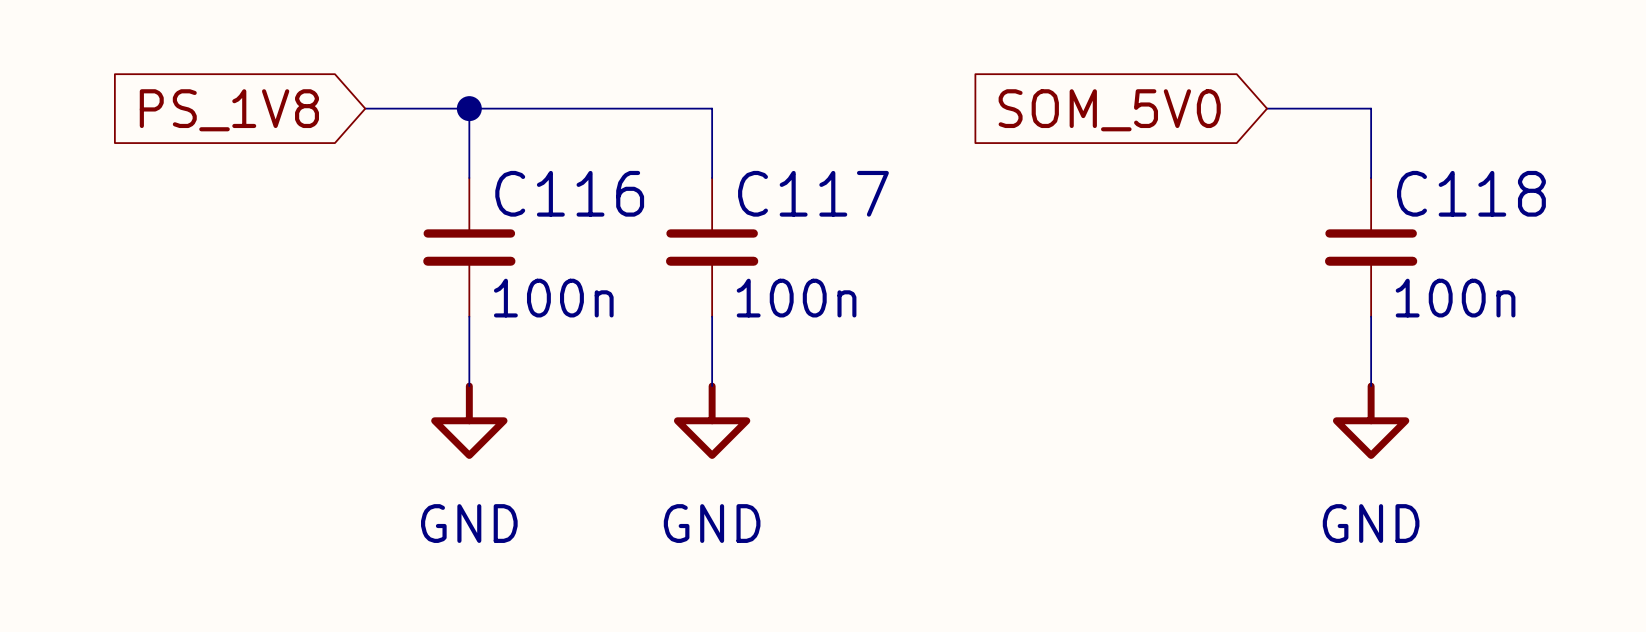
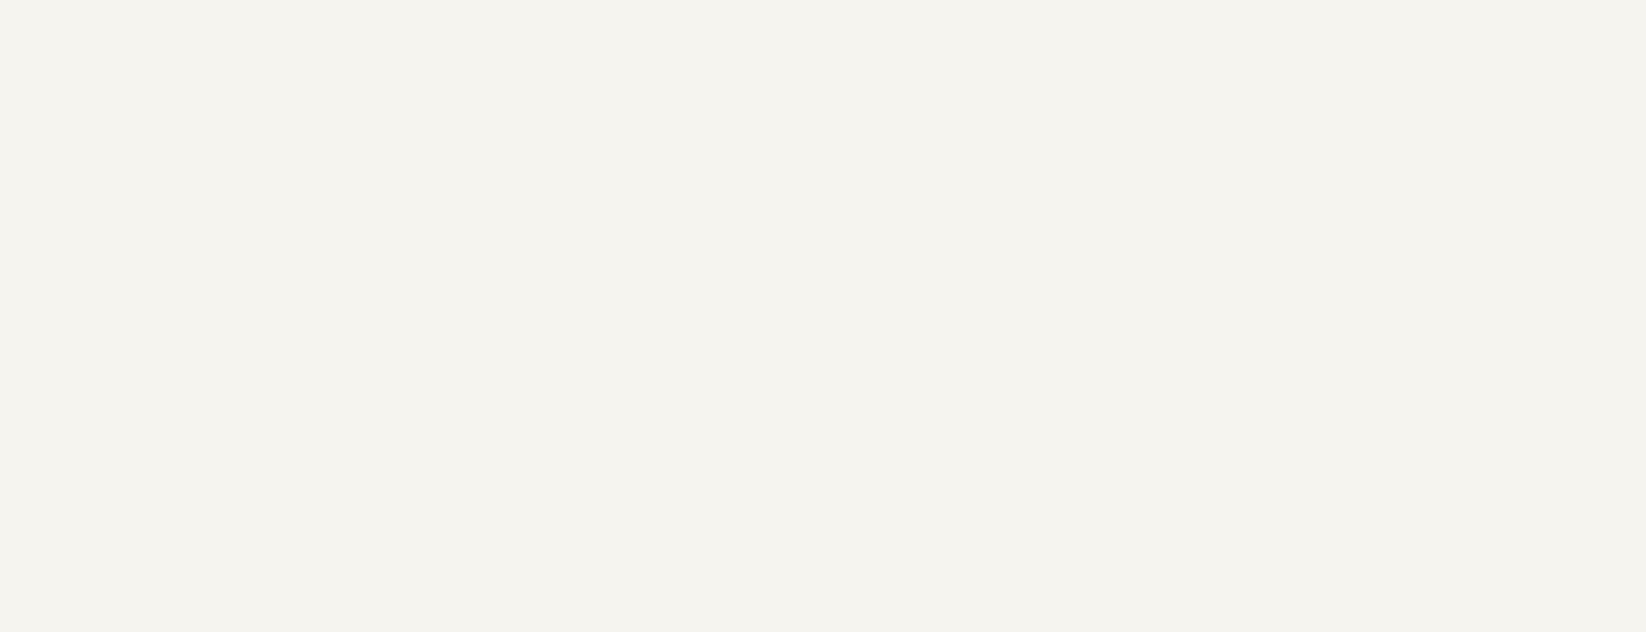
wire: (365, 108) (712, 108) (712, 177) -> none
wire: (469, 108) (469, 177) -> none
junction: (469, 108) -> none
wire: (1267, 108) (1371, 108) (1371, 177) -> none
global label: PS_1V8 (229, 110) -> none
global label: SOM_5V0 (1109, 110) -> none
C116: (469, 247) -> none
C117: (712, 247) -> none
C118: (1371, 247) -> none
wire: (469, 316) (469, 386) -> none
wire: (712, 316) (712, 386) -> none
wire: (1371, 316) (1371, 386) -> none
power symbol: GND (469, 420) -> none
power symbol: GND (712, 420) -> none
power symbol: GND (1371, 420) -> none

